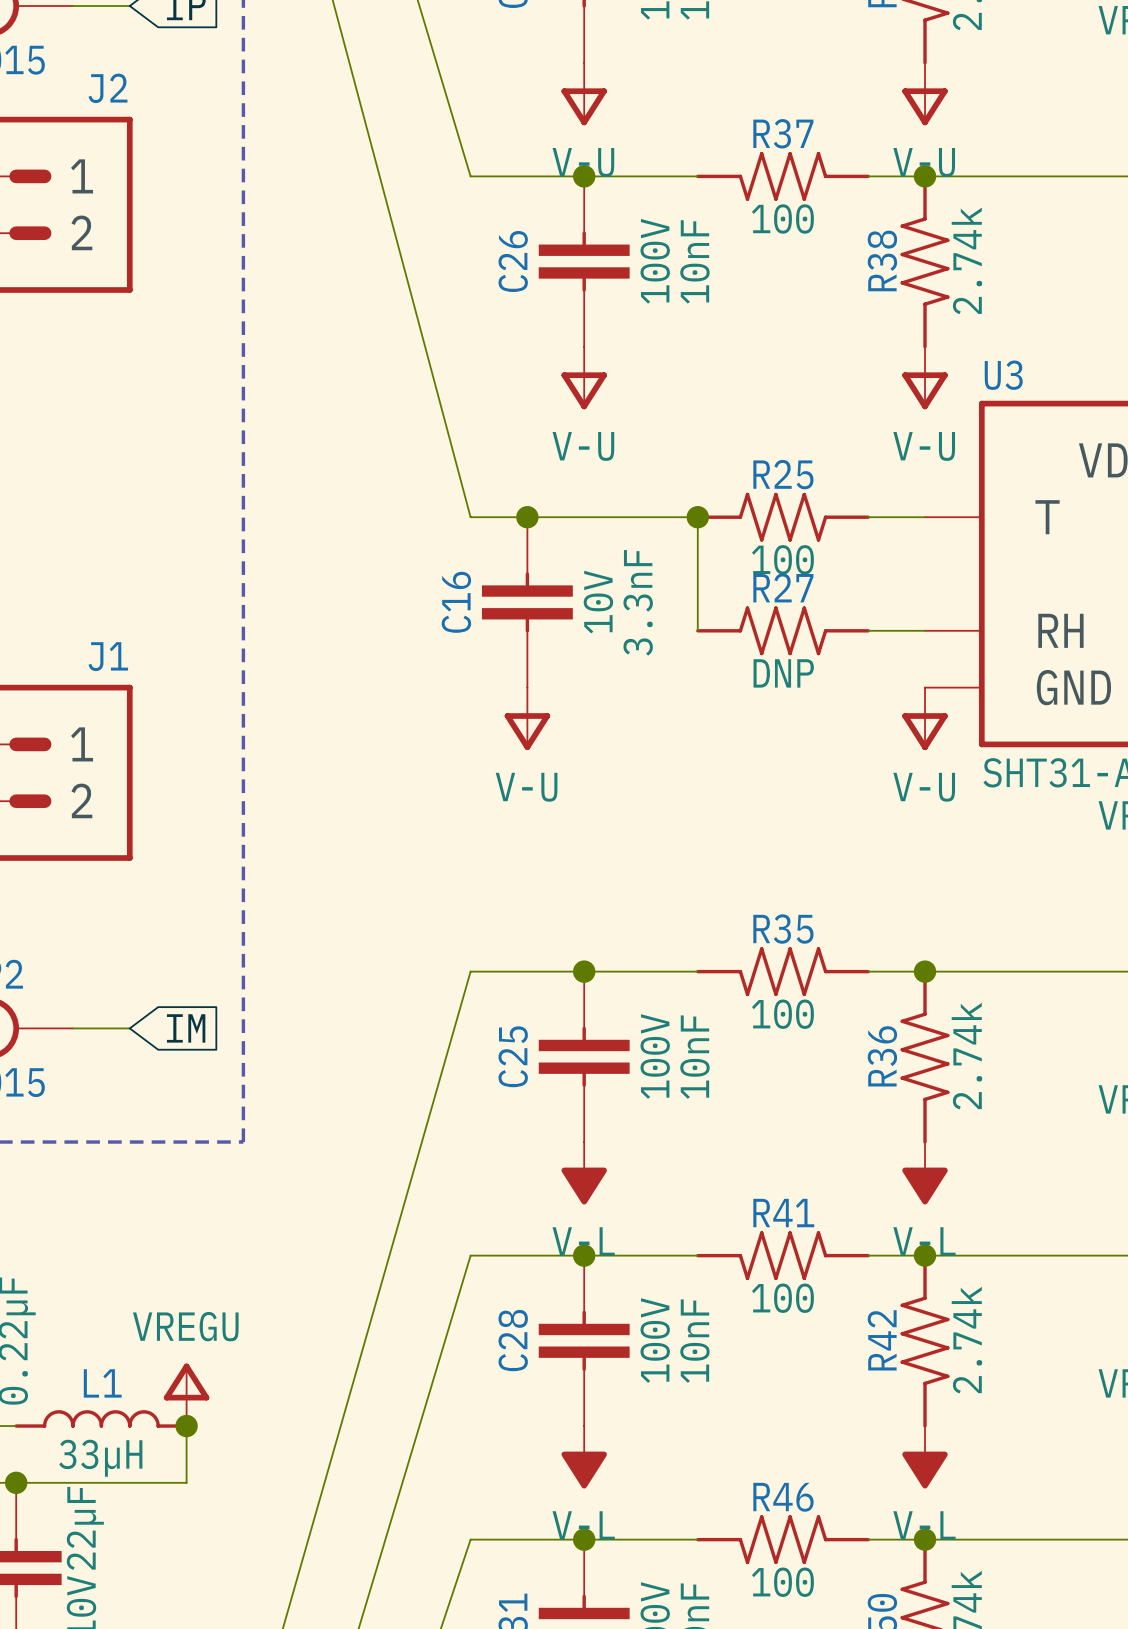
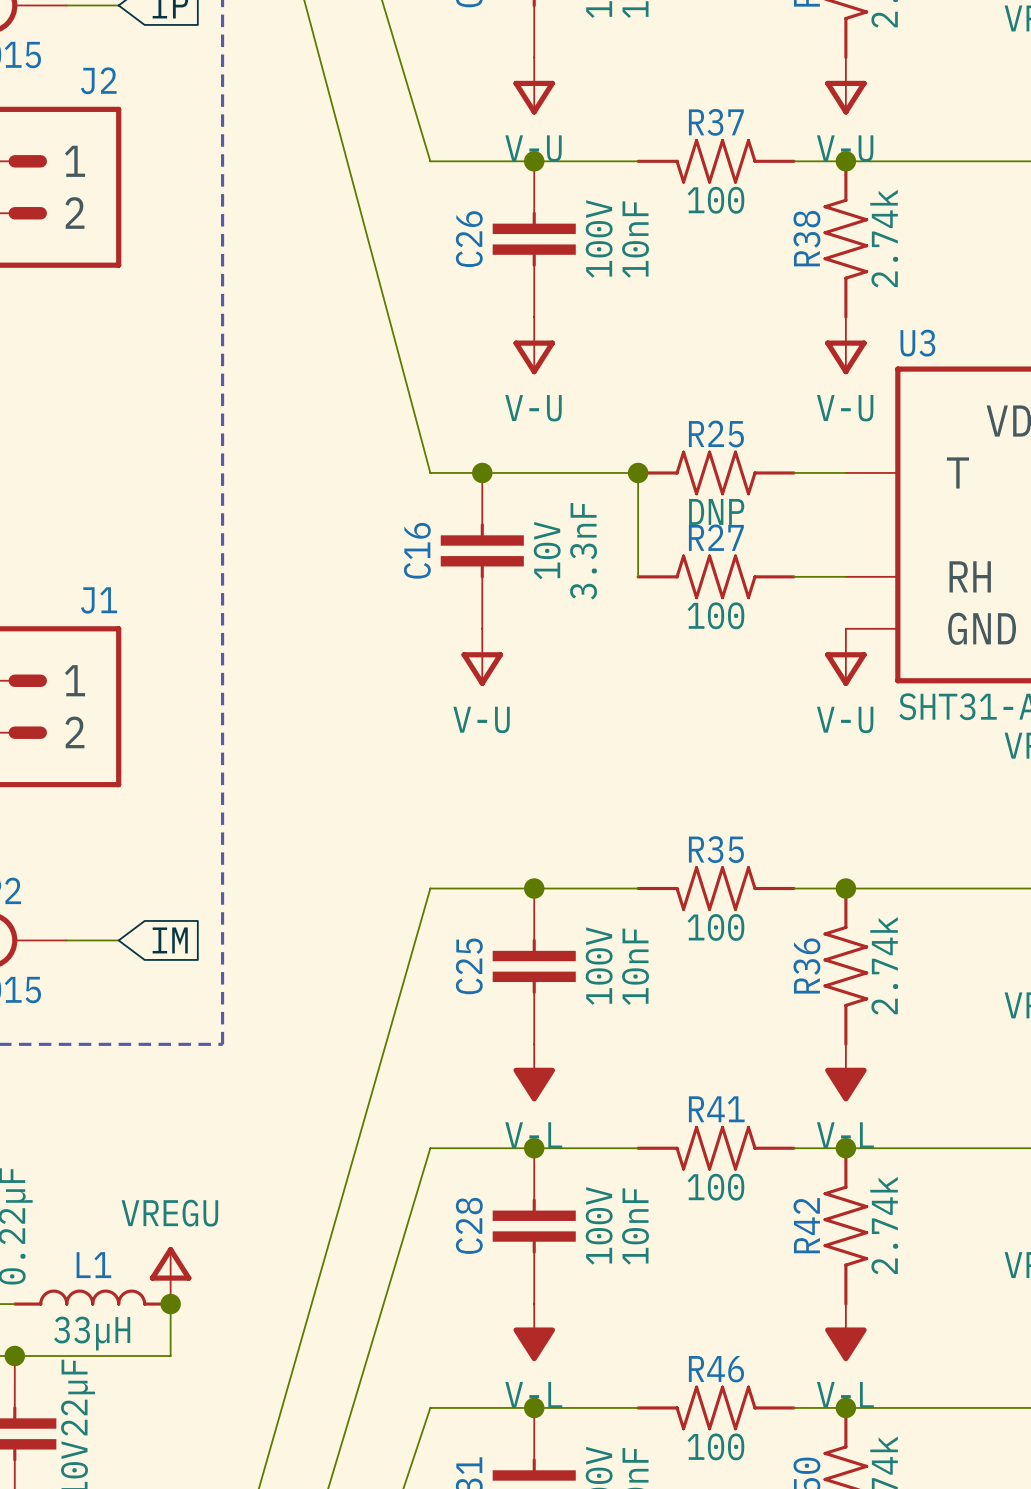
R25 text: 100 (782, 559) -> DNP (716, 511)
R27 text: DNP (783, 673) -> 100 (715, 615)

